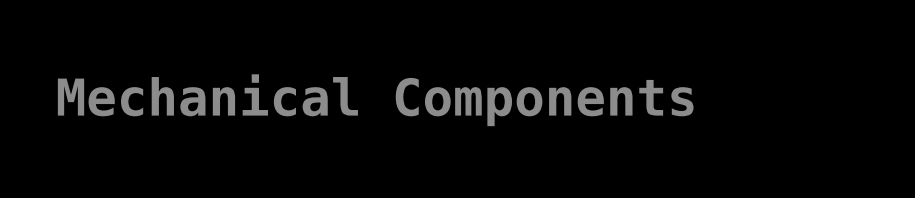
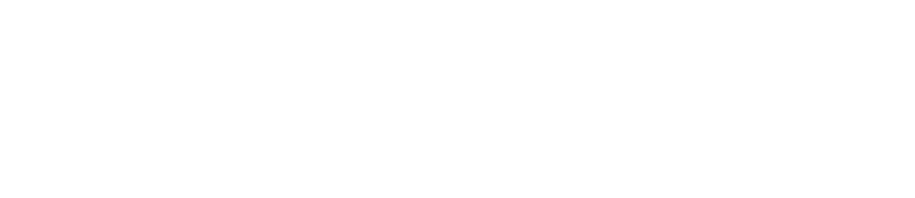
text: Mechanical Components (375, 100) -> none

